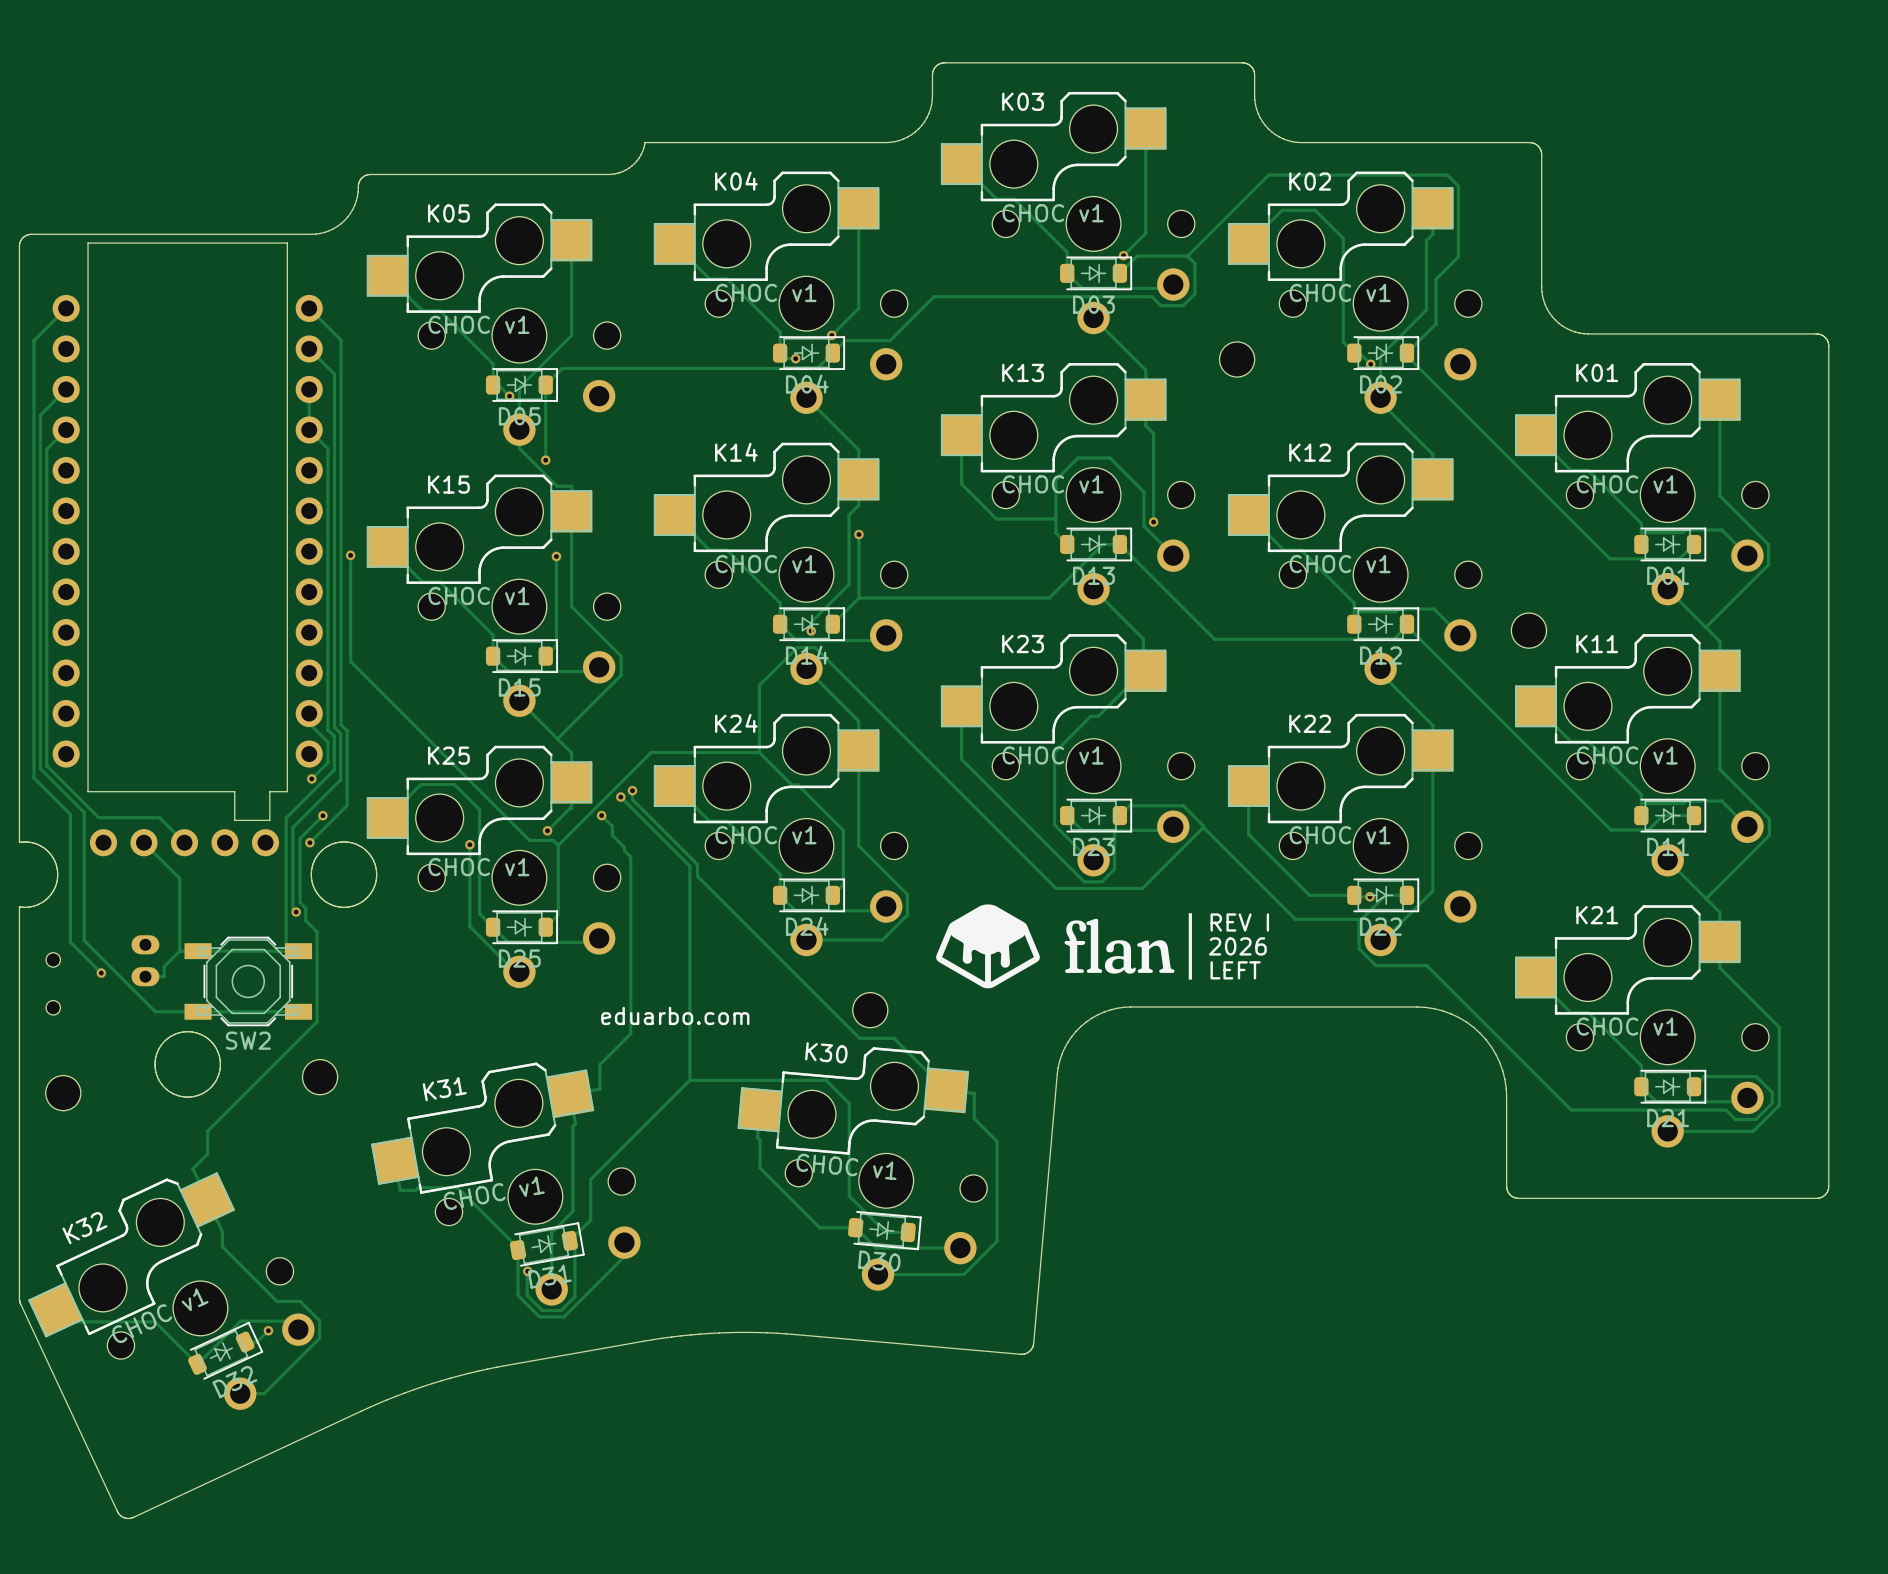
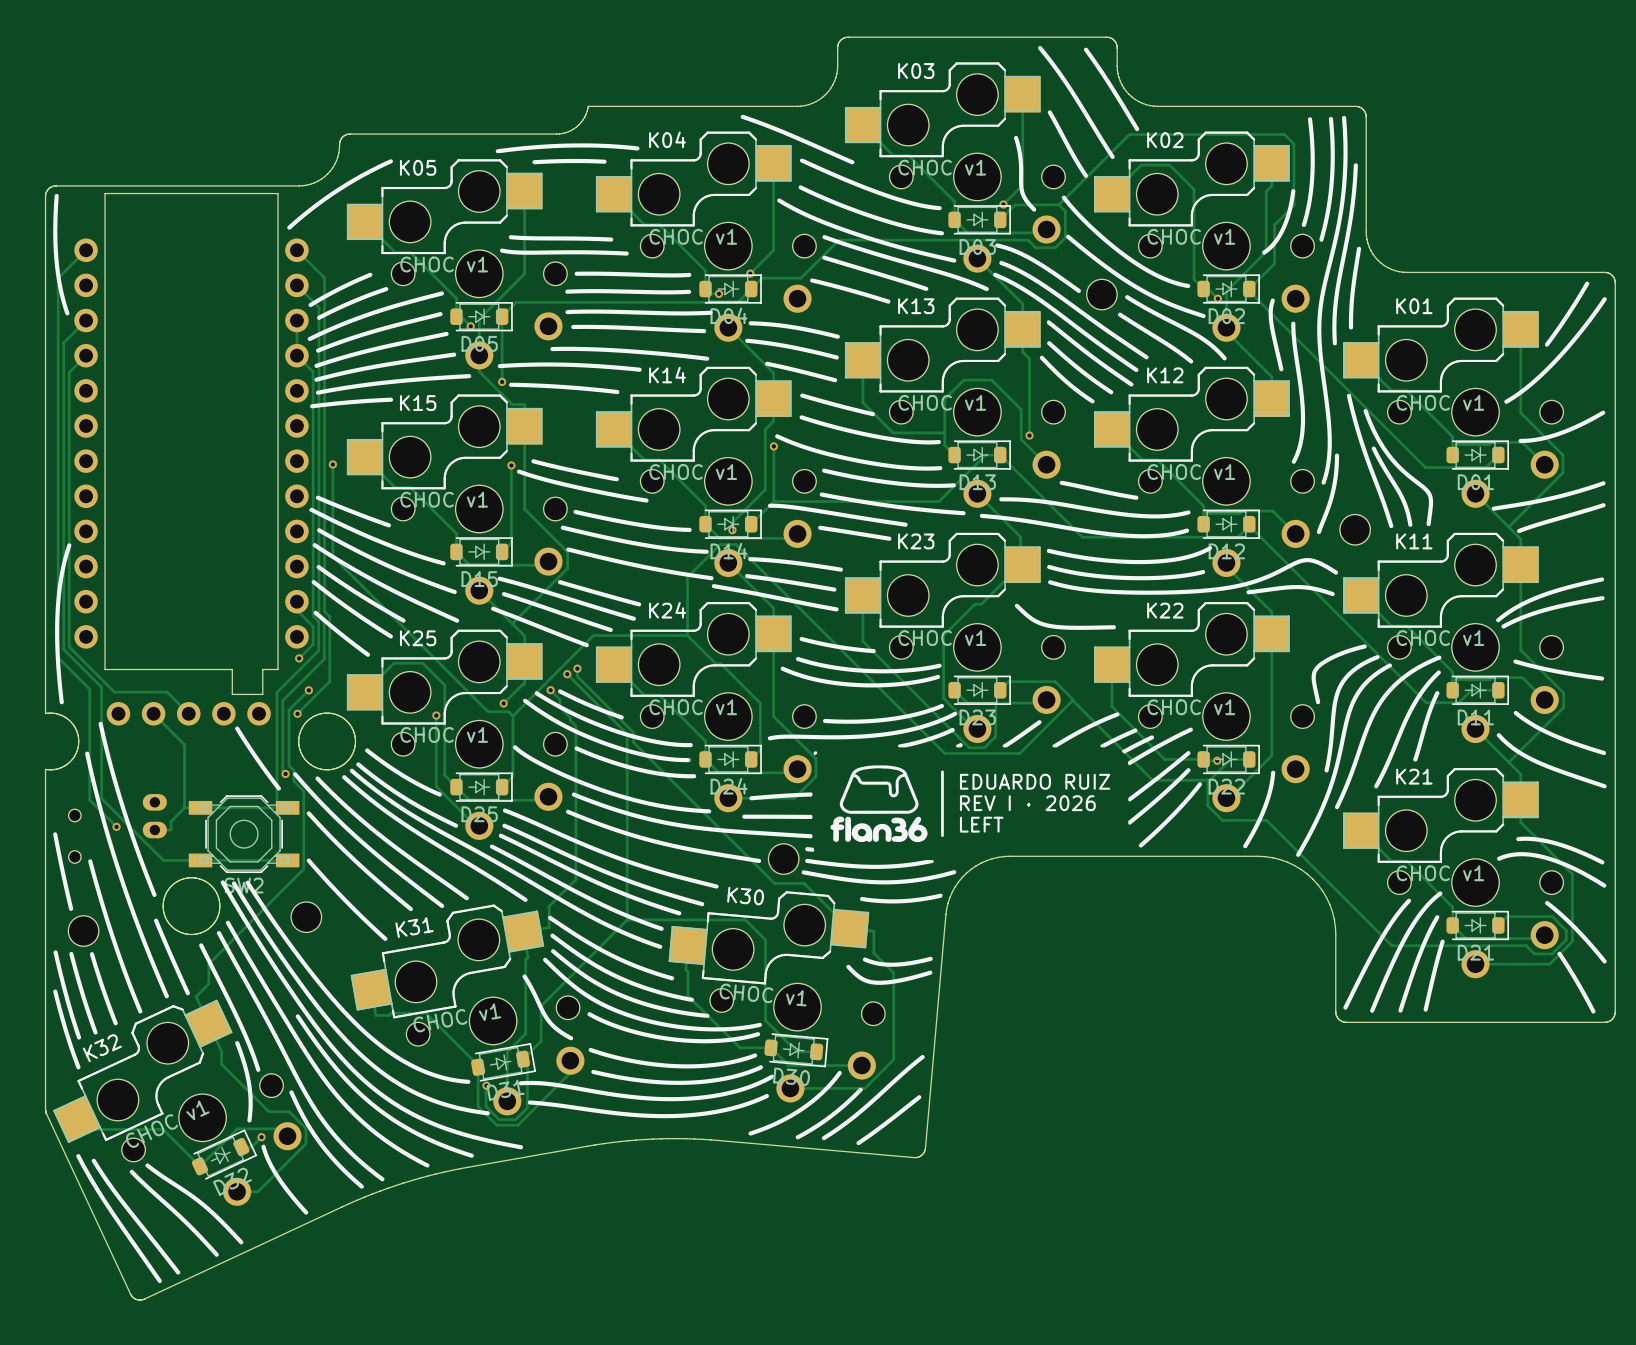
drawing: none -> [1014, 45, 1140, 212]
drawing: none -> [740, 114, 1227, 404]
drawing: none -> [1262, 115, 1434, 535]
drawing: none -> [495, 143, 640, 165]
drawing: none -> [287, 159, 393, 230]
drawing: none -> [53, 193, 70, 316]
drawing: none -> [497, 235, 713, 395]
drawing: none -> [307, 272, 472, 409]
drawing: none -> [1504, 281, 1607, 443]
drawing: none -> [491, 321, 1339, 648]
drawing: none -> [1491, 481, 1606, 534]
drawing: none -> [309, 495, 460, 657]
drawing: none -> [55, 543, 72, 705]
drawing: none -> [1496, 577, 1605, 629]
drawing: none -> [767, 636, 963, 755]
drawing: none -> [1296, 644, 1442, 857]
drawing: none -> [1513, 659, 1605, 681]
drawing: none -> [53, 689, 957, 1284]
drawing: none -> [1496, 710, 1607, 789]
drawing: none -> [1002, 712, 1203, 848]
drawing: none -> [830, 765, 944, 843]
drawing: [936, 904, 1040, 989] -> none
drawing: none -> [1243, 770, 1276, 849]
drawing: [1064, 913, 1192, 980] -> none
text: none -> EDUARDO RUIZ (1035, 781)
text: REV I (1239, 922) -> none
text: none -> REV I · 2026 (1027, 803)
text: 2026 (1237, 946) -> none
text position: LEFT (1235, 970) -> LEFT (981, 824)
drawing: none -> [1497, 836, 1607, 1014]
text: eduarbo.com (675, 1015) -> none
drawing: none -> [1343, 891, 1445, 1013]
drawing: none -> [846, 956, 933, 985]

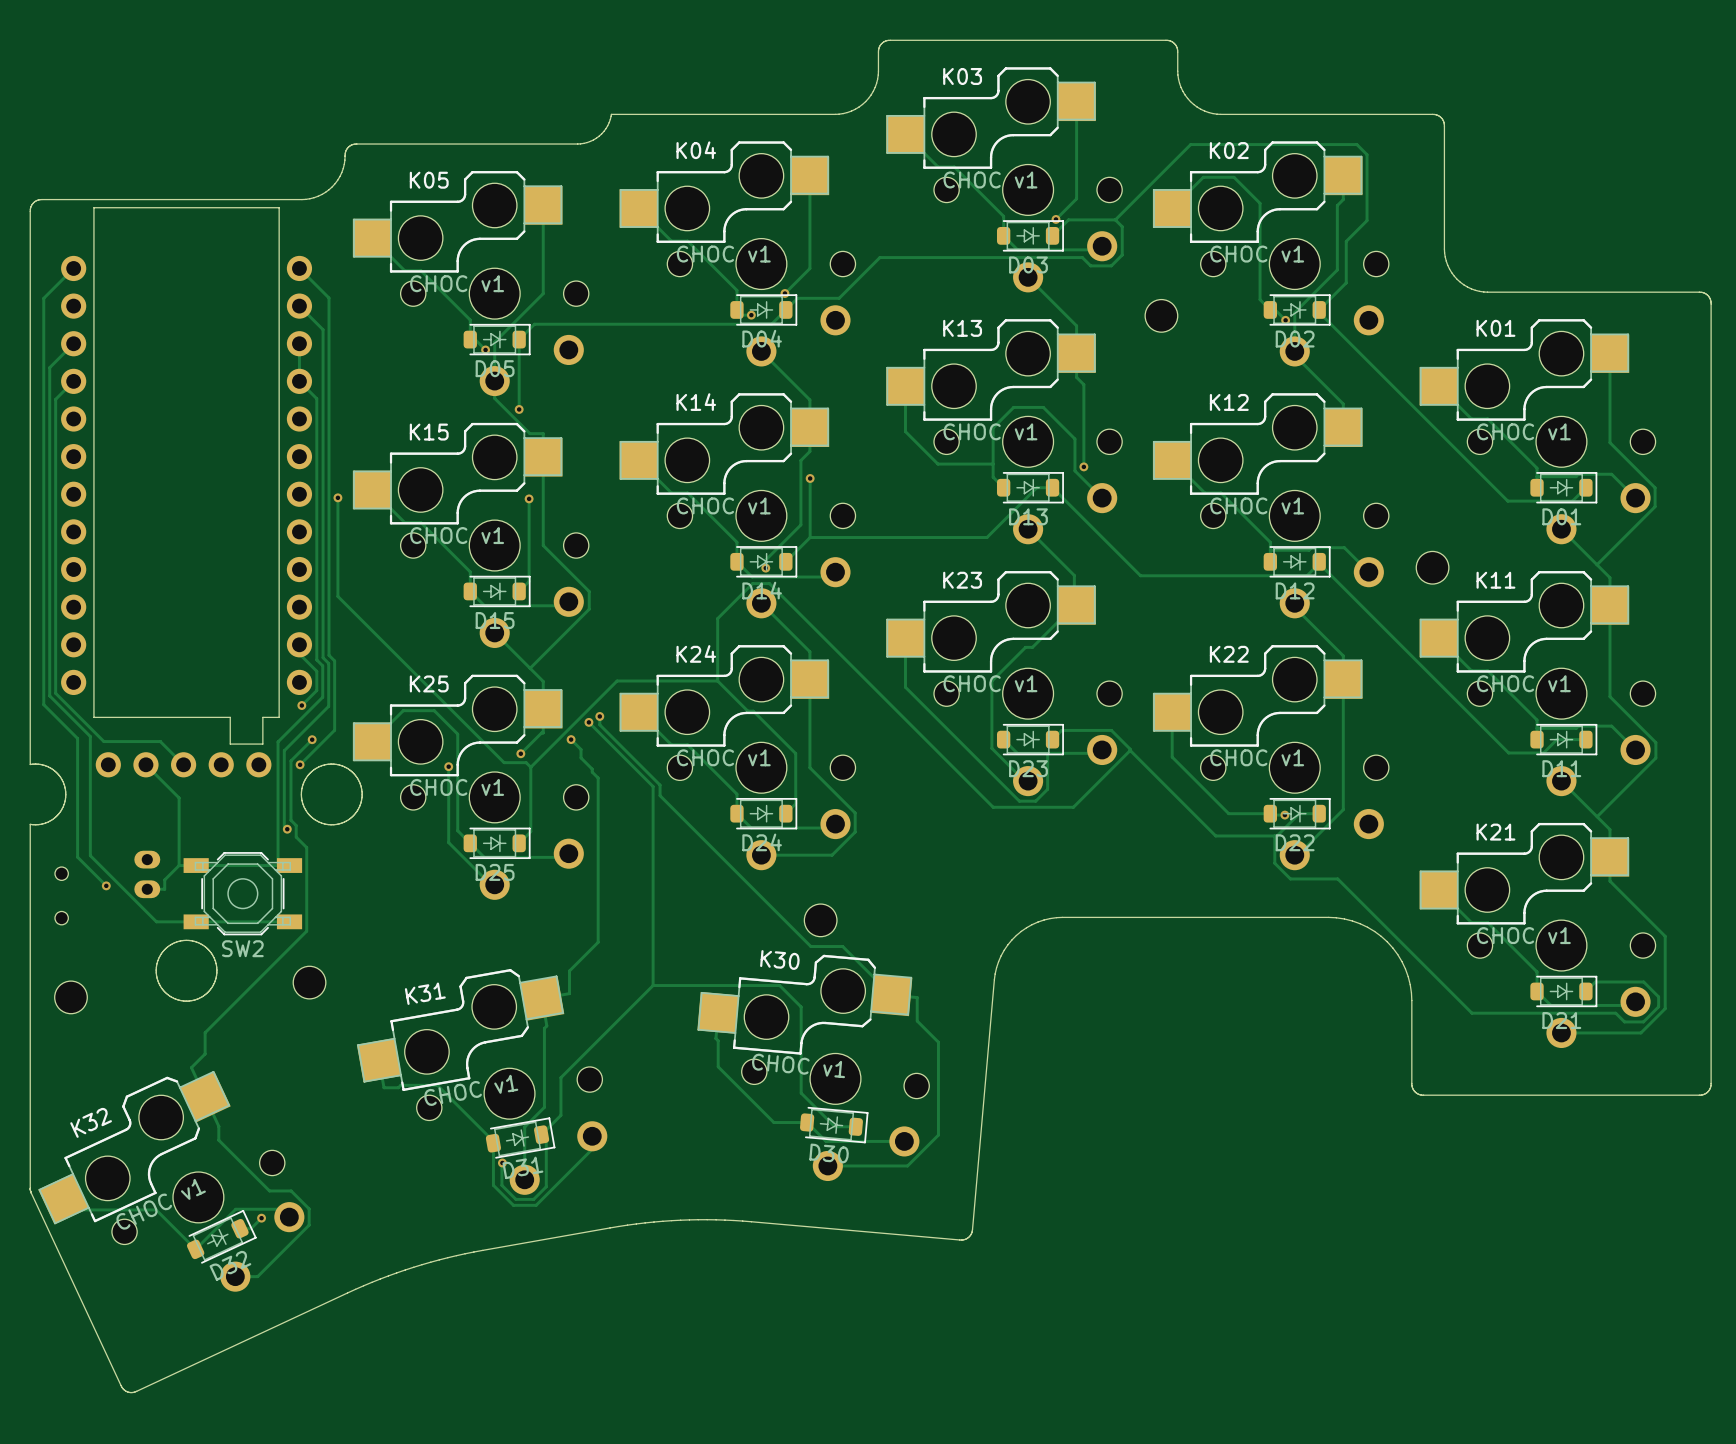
drawing: [1014, 45, 1140, 212] -> none
drawing: [740, 114, 1227, 404] -> none
drawing: [1262, 115, 1434, 535] -> none
drawing: [495, 143, 640, 165] -> none
drawing: [287, 159, 393, 230] -> none
drawing: [53, 193, 70, 316] -> none
drawing: [497, 235, 713, 395] -> none
drawing: [307, 272, 472, 409] -> none
drawing: [1504, 281, 1607, 443] -> none
drawing: [491, 321, 1339, 648] -> none
drawing: [1491, 481, 1606, 534] -> none
drawing: [309, 495, 460, 657] -> none
drawing: [55, 543, 72, 705] -> none
drawing: [1496, 577, 1605, 629] -> none
drawing: [767, 636, 963, 755] -> none
drawing: [1296, 644, 1442, 857] -> none
drawing: [1513, 659, 1605, 681] -> none
drawing: [53, 689, 957, 1284] -> none
drawing: [1496, 710, 1607, 789] -> none
drawing: [1002, 712, 1203, 848] -> none
drawing: [830, 765, 944, 843] -> none
drawing: [1243, 770, 1276, 849] -> none
text: EDUARDO RUIZ (1035, 781) -> none
text: REV I · 2026 (1027, 803) -> none
text: LEFT (981, 824) -> none
drawing: [1497, 836, 1607, 1014] -> none
drawing: [1343, 891, 1445, 1013] -> none
drawing: [846, 956, 933, 985] -> none

